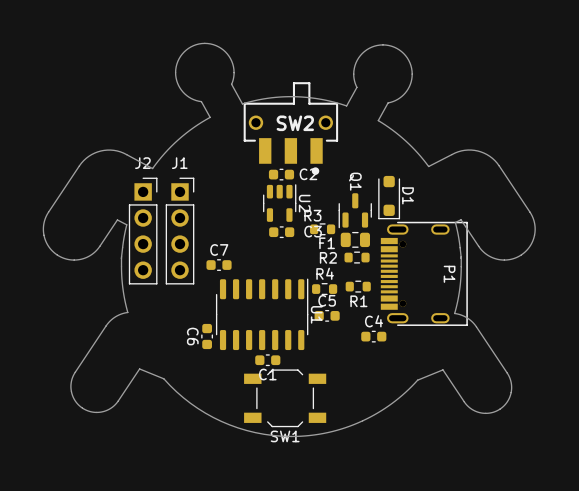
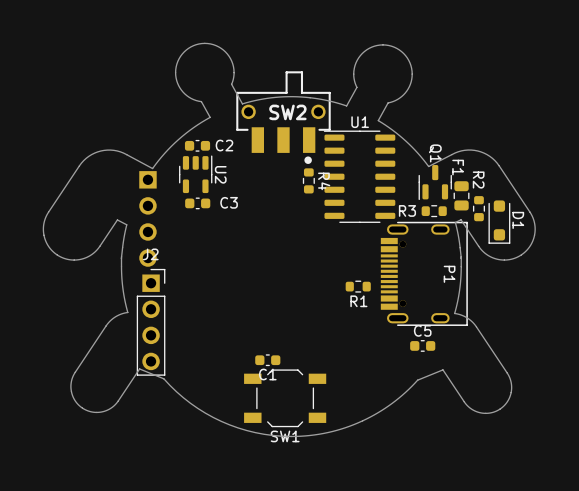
SW2 position: (290, 128) -> (283, 117)
C2 position: (281, 174) -> (197, 145)
D1 position: (389, 197) -> (499, 222)
U2 position: (279, 203) -> (195, 174)
Q1 position: (355, 210) -> (435, 182)
R3 name position: R3 (312, 215) -> R3 (407, 210)
R3 position: (322, 229) -> (434, 211)
J2 position: (143, 231) -> (151, 322)
J1 side: bottom (180, 231) -> top (147, 218)
C3 position: (281, 232) -> (197, 203)
F1 rotation: 0° (355, 239) -> 90° clockwise (461, 195)
F1 position: (355, 239) -> (461, 195)
R2 rotation: 0° (357, 257) -> 90° clockwise (478, 208)
R2 position: (357, 257) -> (478, 208)
C7: (219, 265) -> none
R4 rotation: 0° (324, 289) -> 90° clockwise (308, 180)
R4 position: (324, 289) -> (308, 180)
U1 rotation: 0° (262, 314) -> 90° counterclockwise (359, 176)
U1 position: (262, 314) -> (359, 176)
C5 position: (327, 315) -> (422, 345)
C6: (207, 336) -> none
C4: (373, 336) -> none

